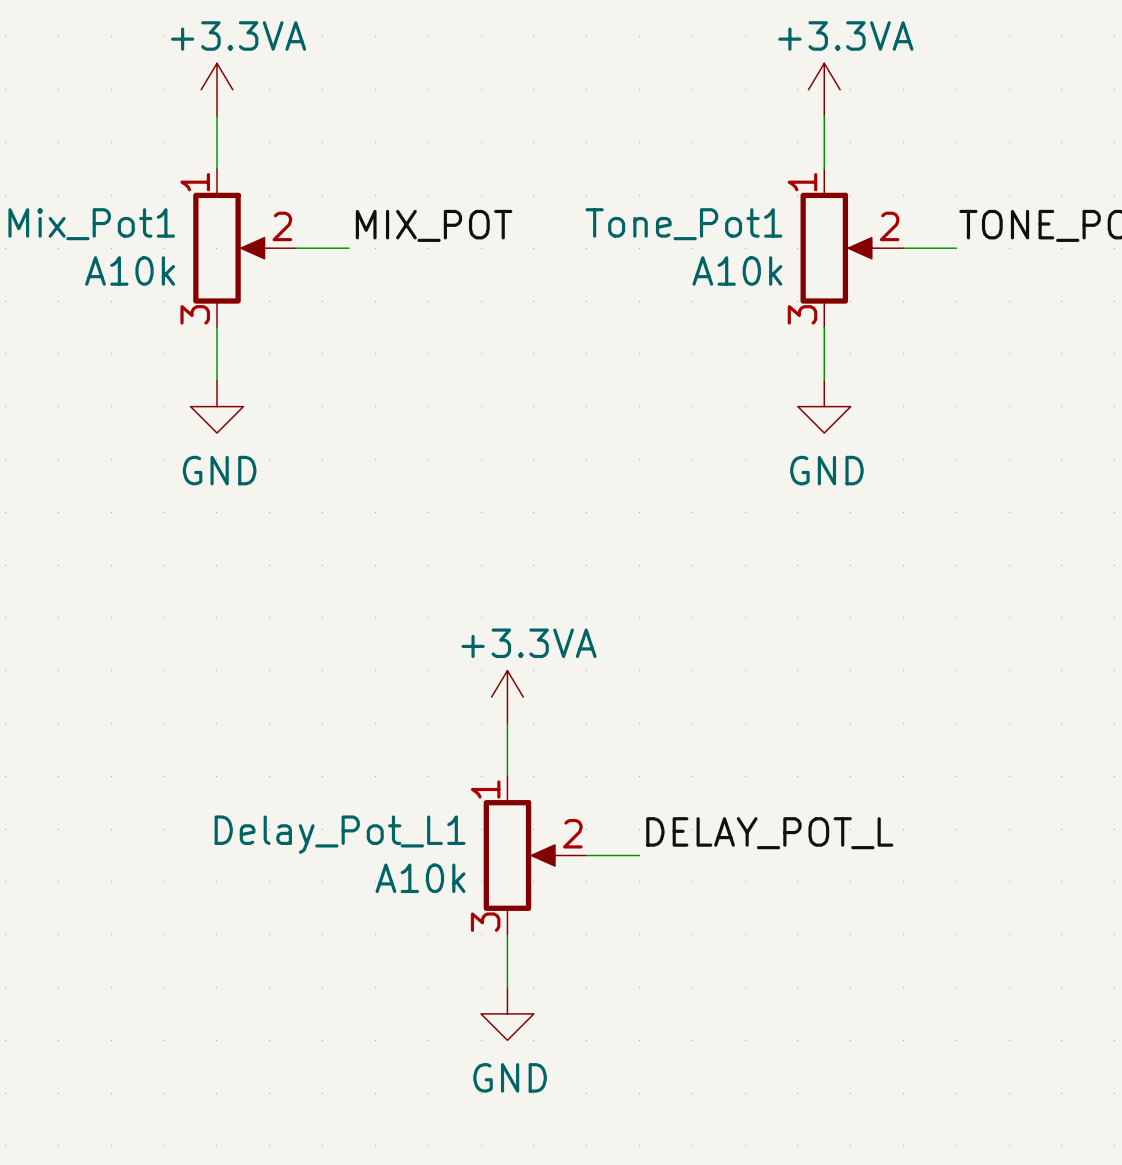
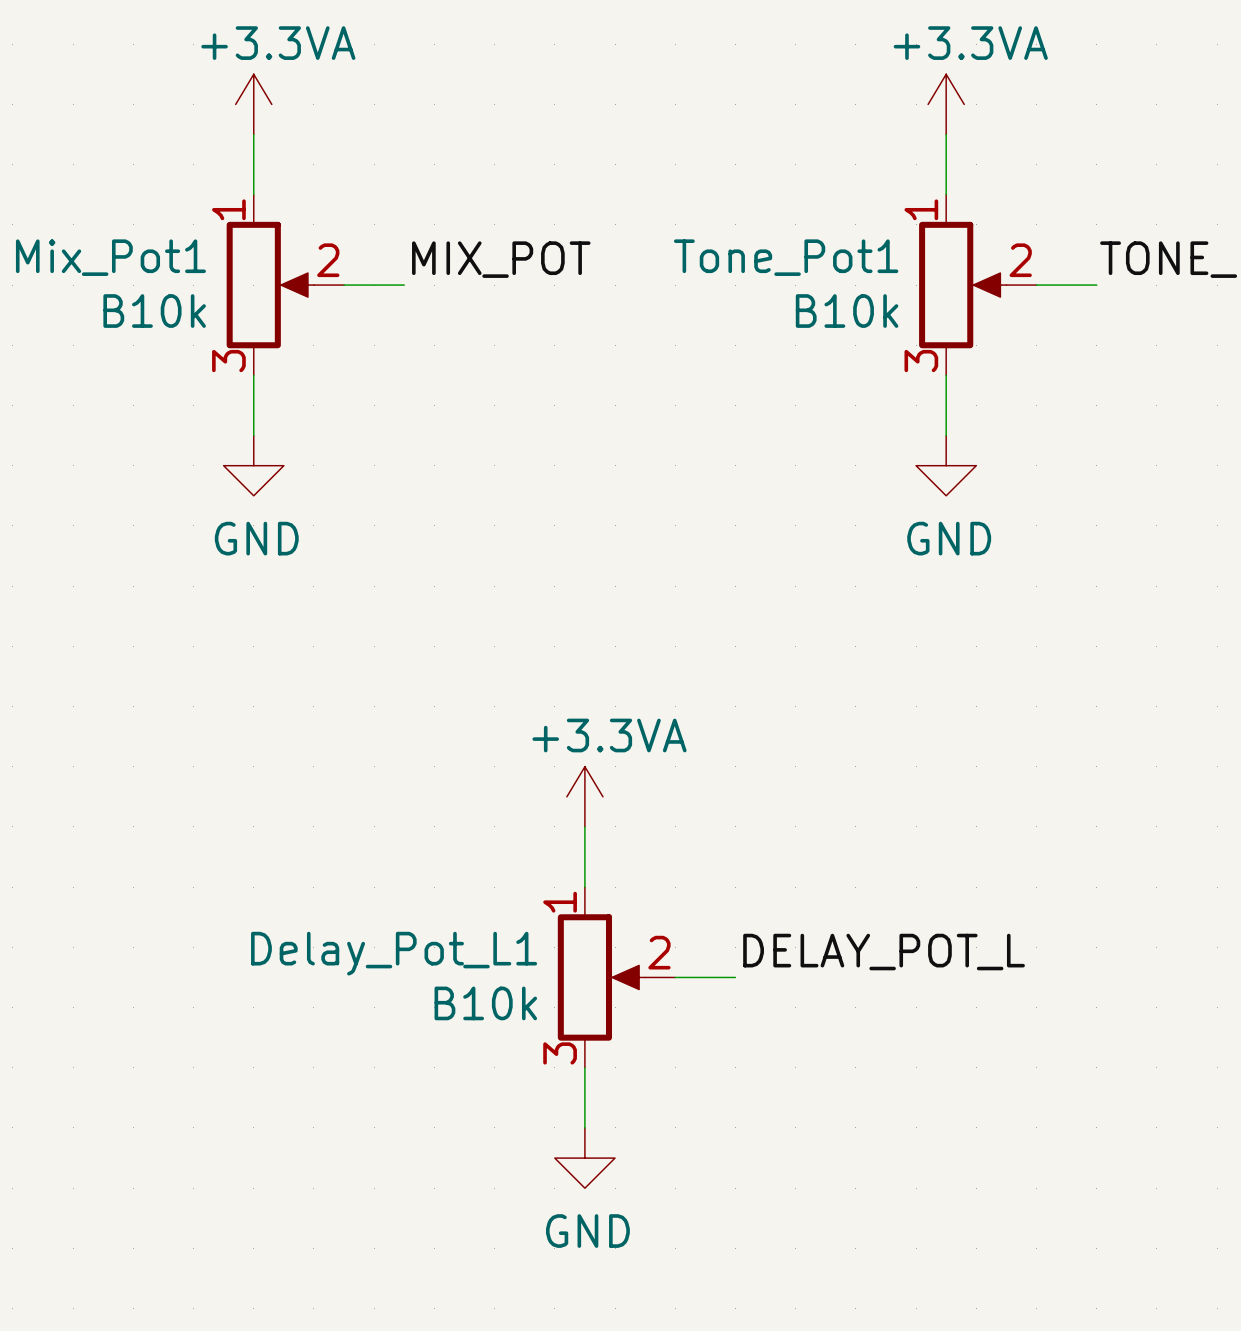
Mix_Pot1 value: A10k (130, 270) -> B10k (154, 311)
Tone_Pot1 value: A10k (737, 270) -> B10k (847, 311)
Delay_Pot_L1 value: A10k (420, 878) -> B10k (485, 1003)

